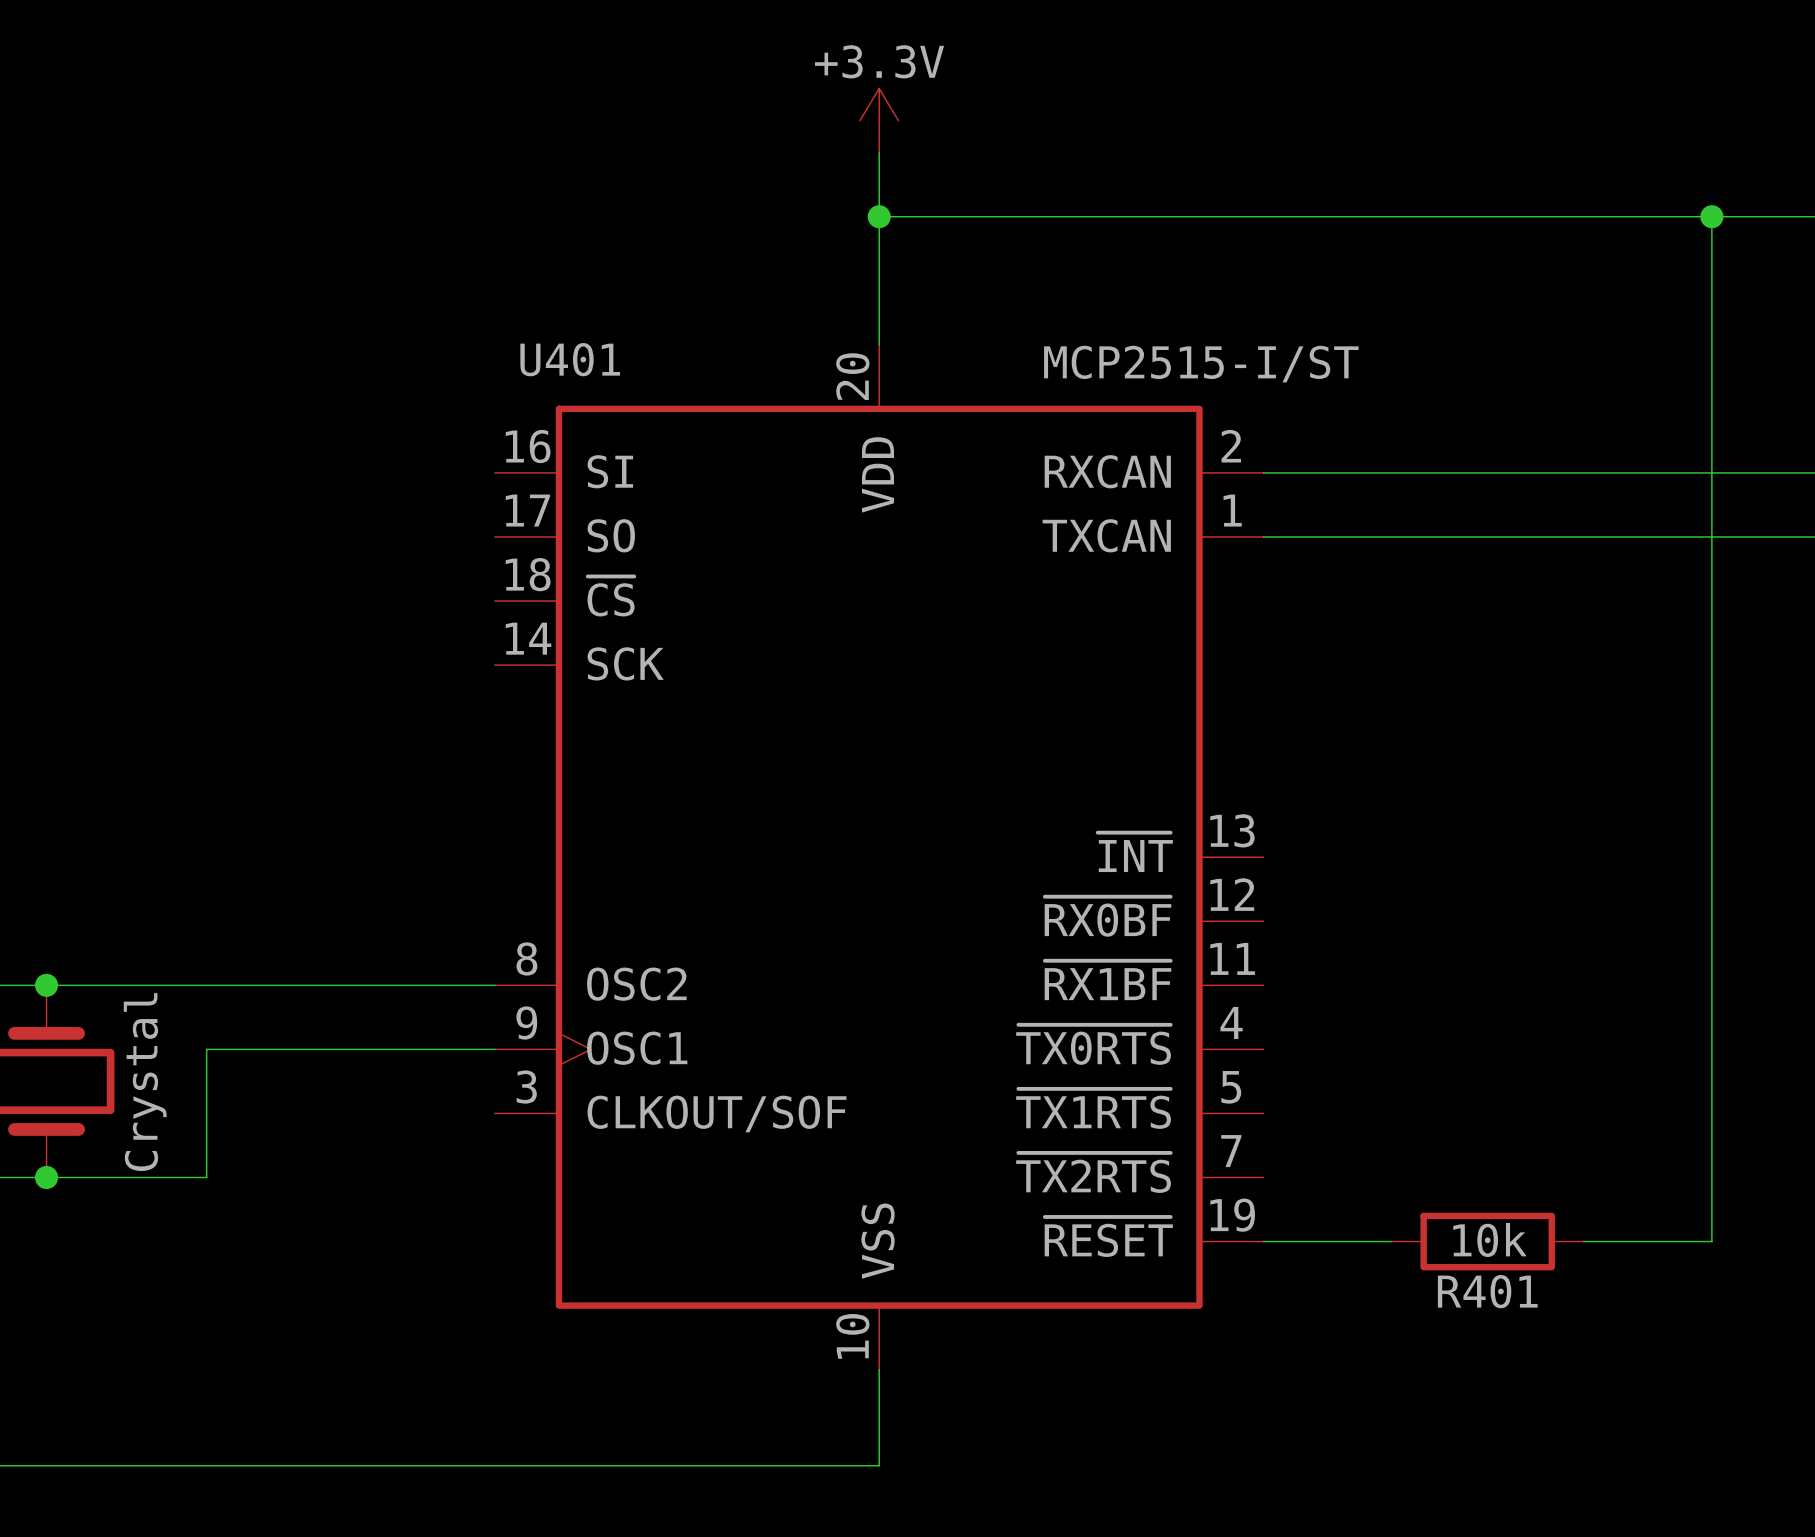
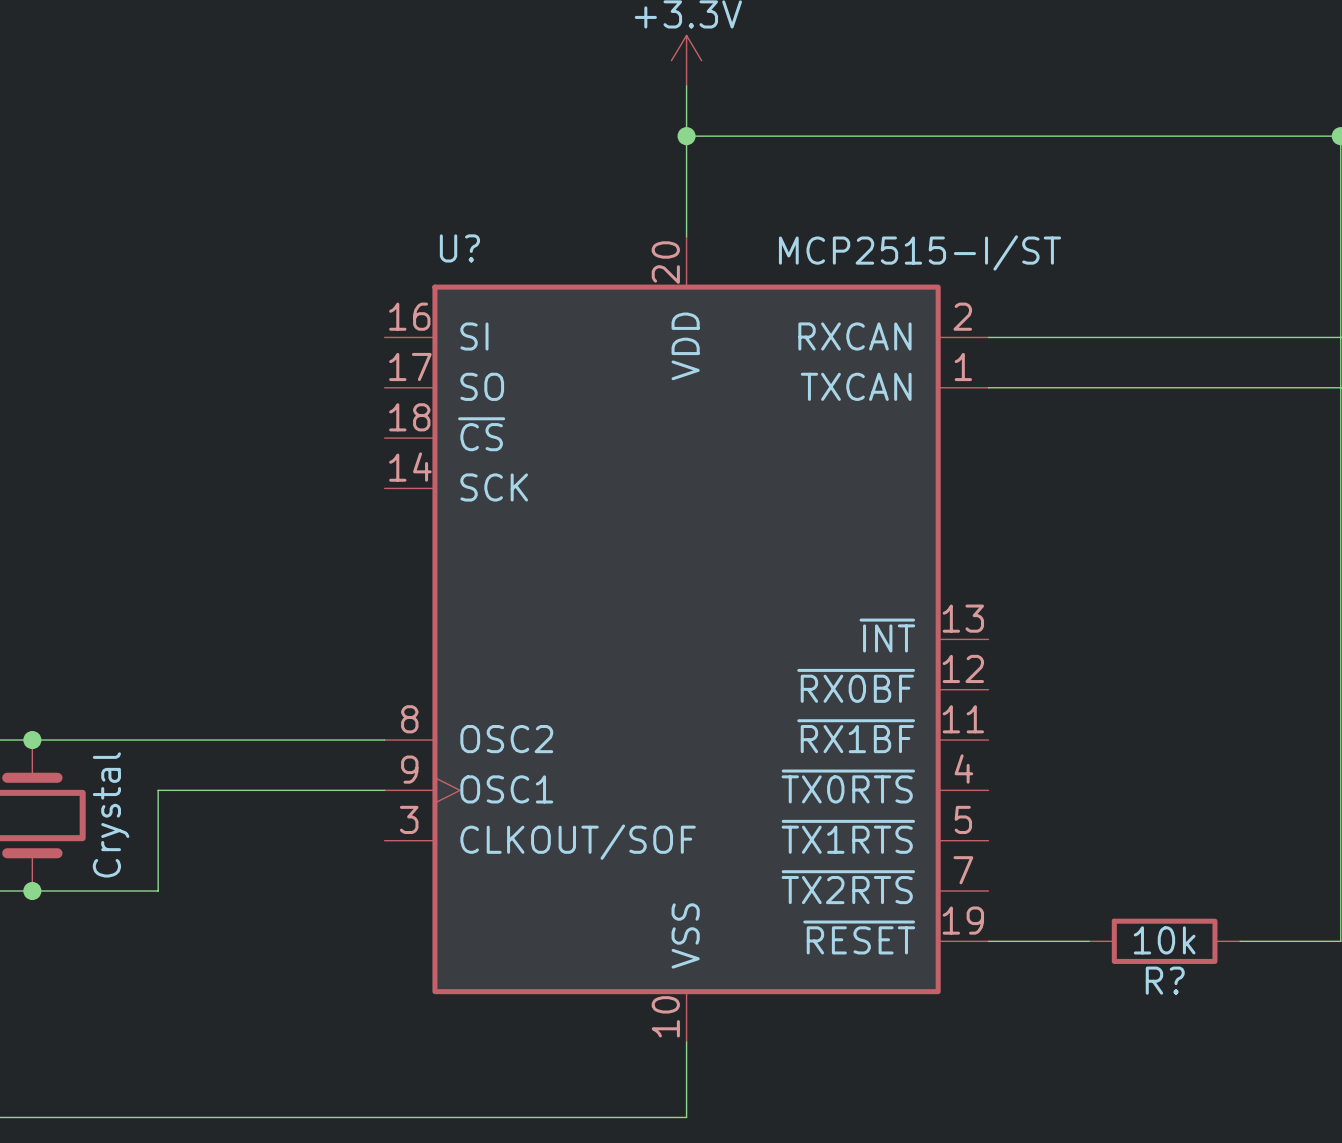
U401 name: U401 (570, 359) -> U? (459, 248)
R401 name: R401 (1487, 1291) -> R? (1165, 980)

